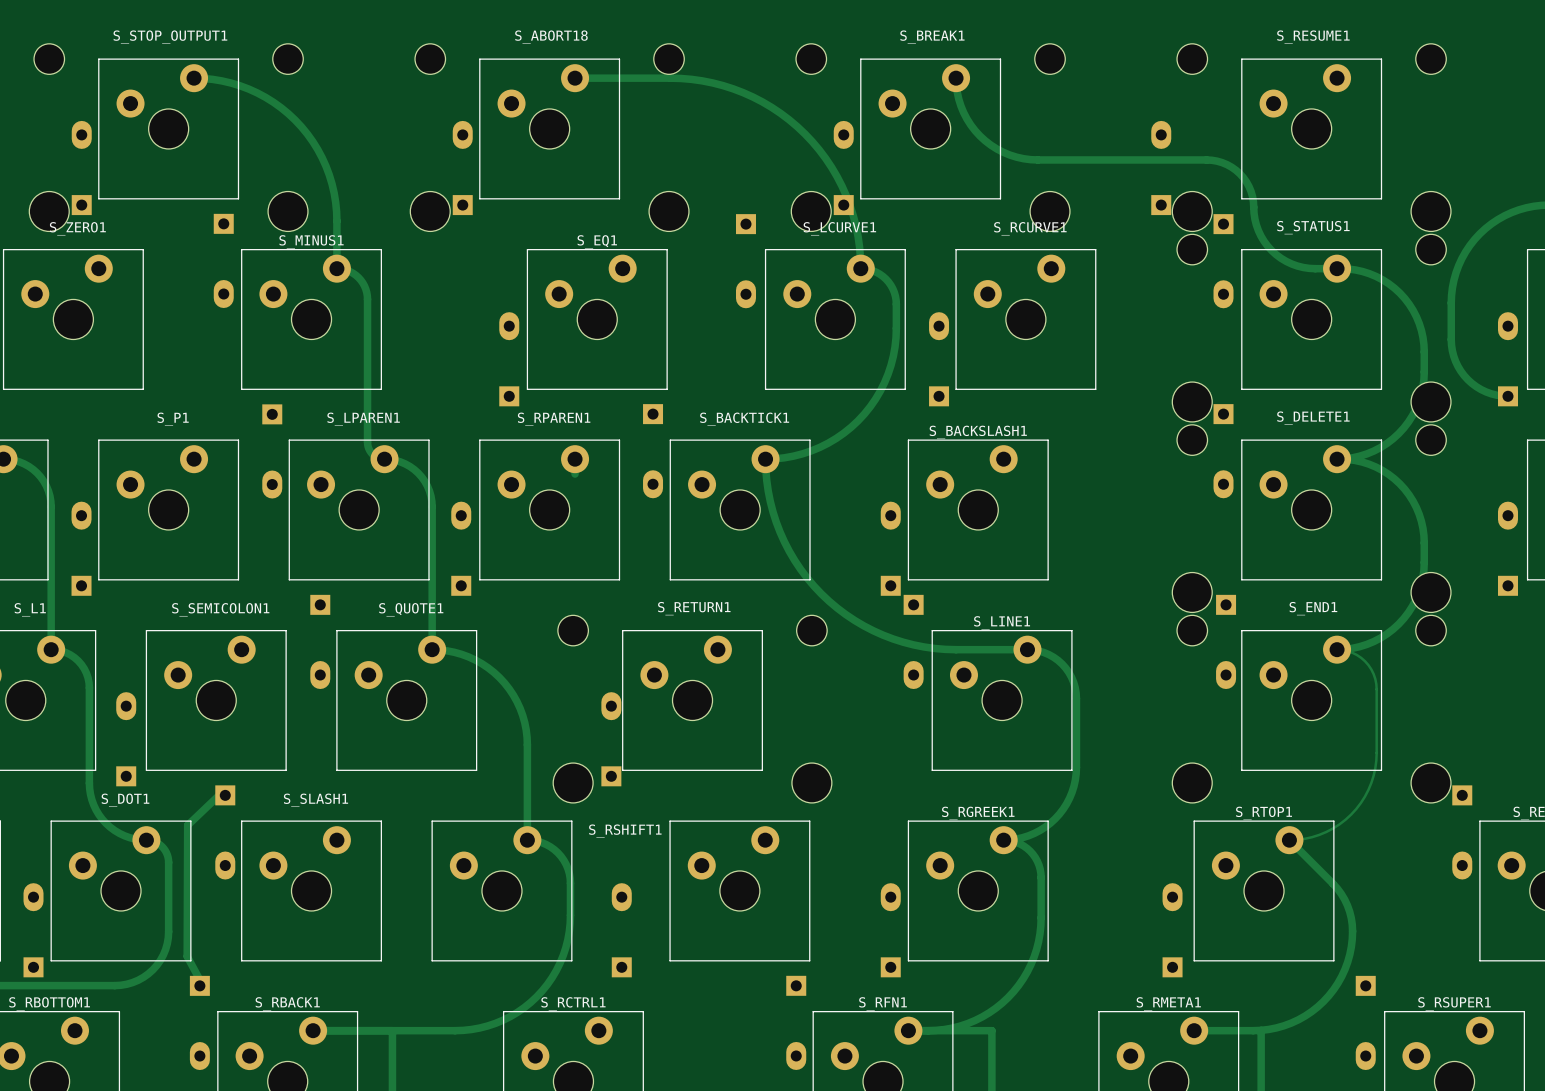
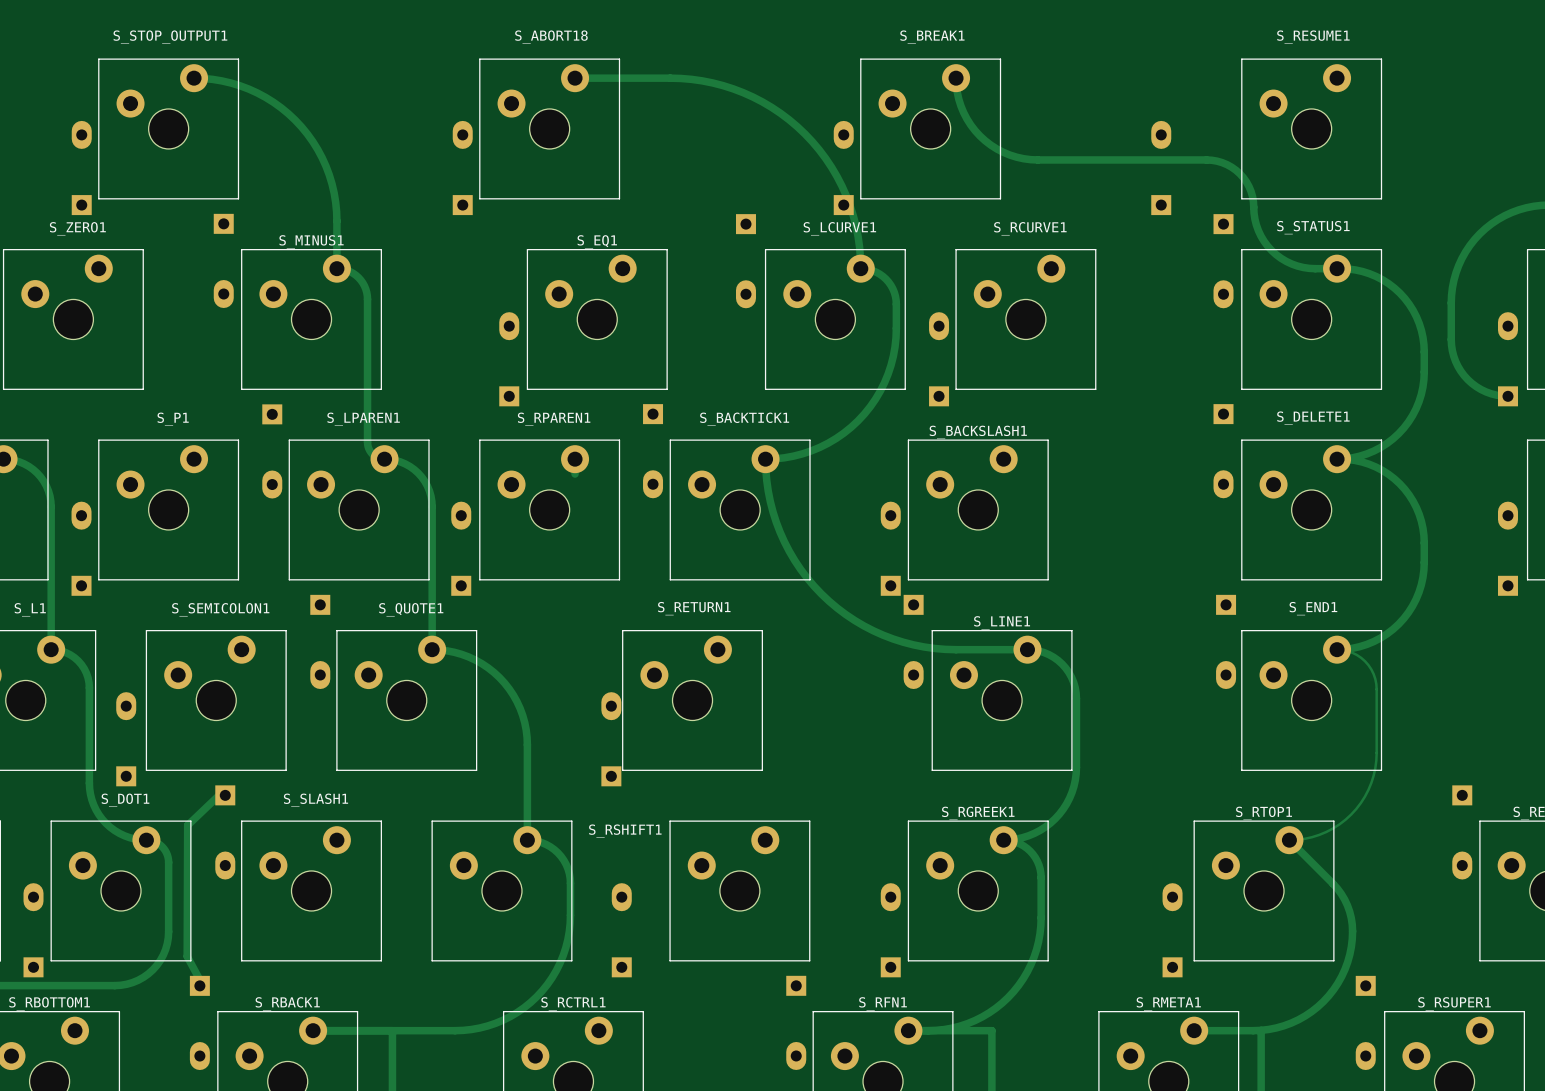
S_STOP_OUTPUT1 footprint: [29, 43, 308, 232] -> [98, 58, 240, 200]
S_ABORT18 footprint: [410, 43, 689, 232] -> [479, 58, 621, 200]
S_BREAK1 footprint: [791, 43, 1070, 232] -> [860, 58, 1002, 200]
S_RESUME1 footprint: [1172, 43, 1451, 232] -> [1241, 58, 1383, 200]
S_STATUS1 footprint: [1172, 234, 1451, 422] -> [1241, 249, 1383, 390]
S_DELETE1 footprint: [1172, 424, 1451, 613] -> [1241, 439, 1383, 581]
S_RETURN1 footprint: [553, 615, 832, 803] -> [622, 630, 763, 771]
S_END1 footprint: [1172, 615, 1451, 803] -> [1241, 630, 1383, 771]

